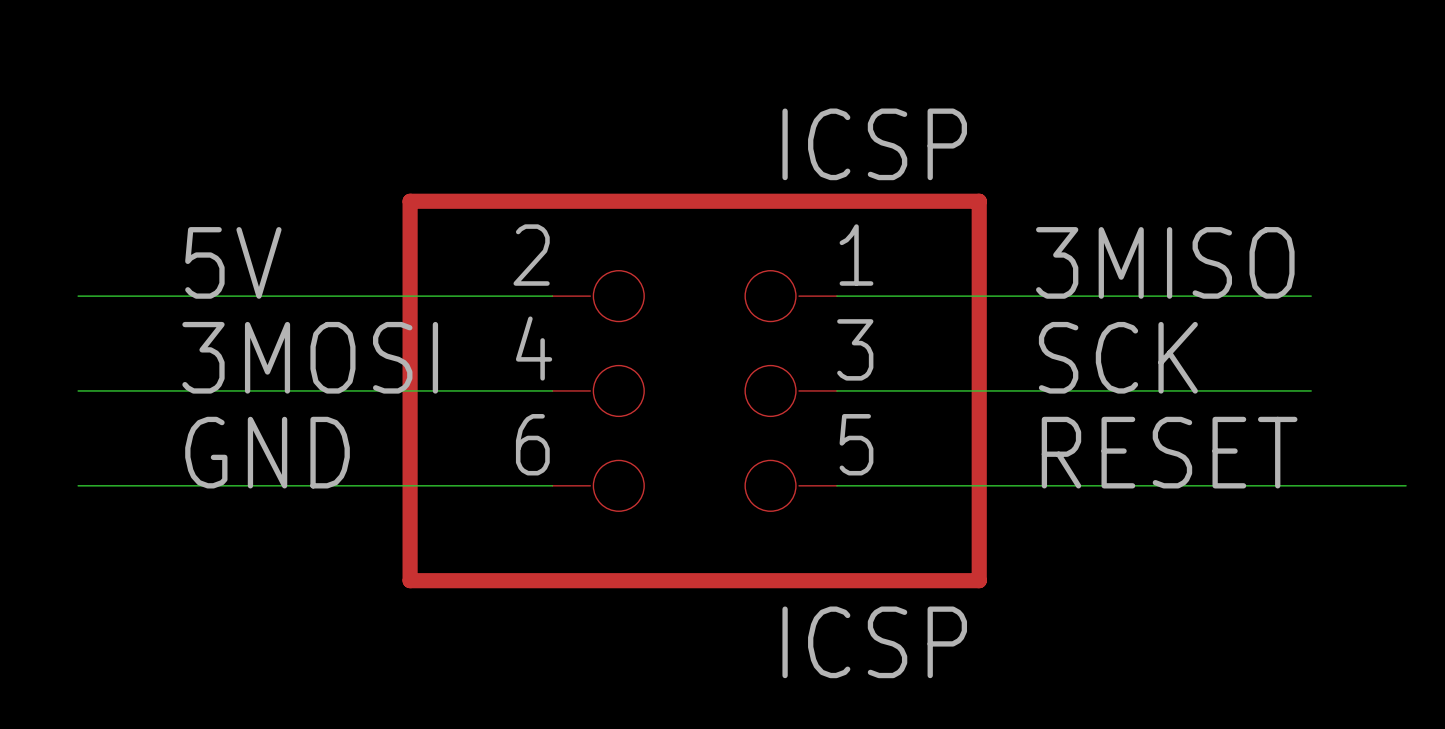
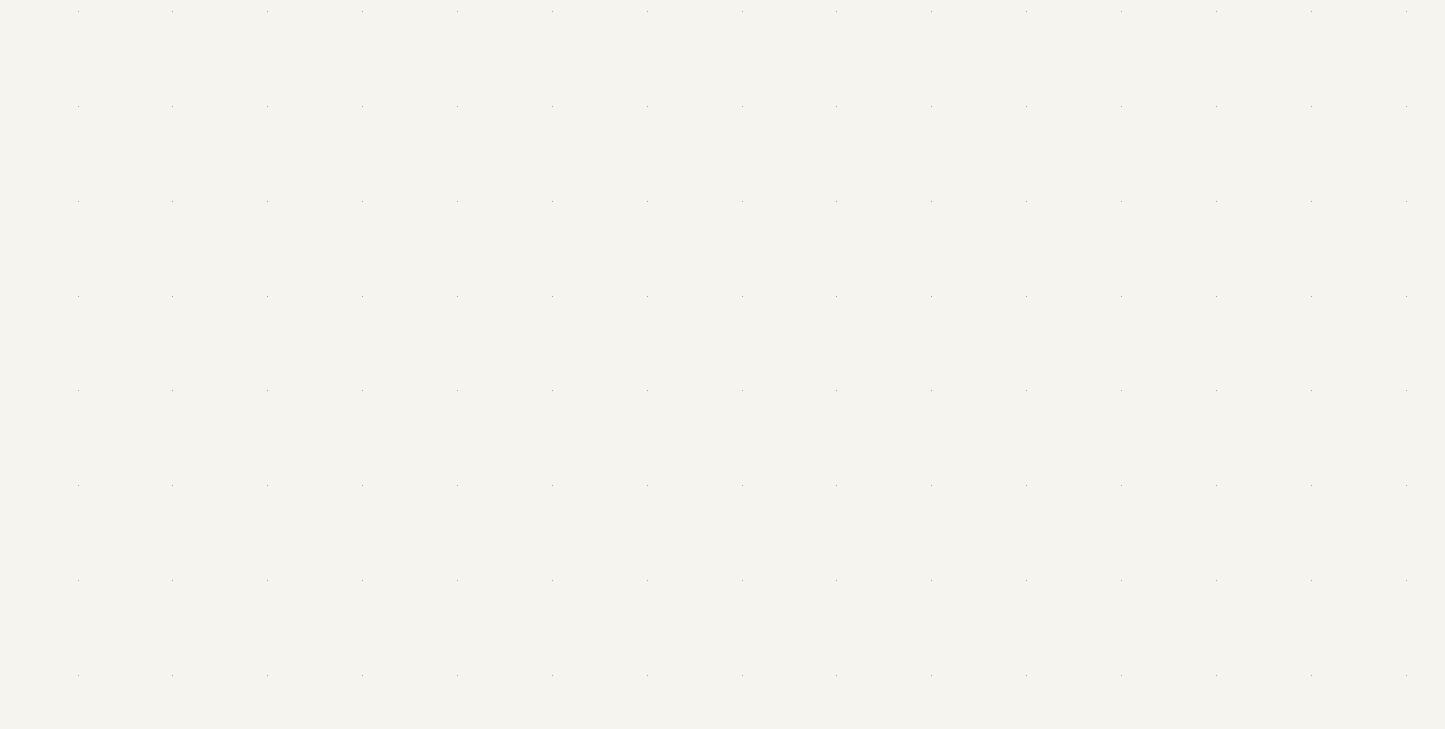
label: 5V (233, 262) -> none
label: 3MISO (1165, 262) -> none
wire: (78, 296) (552, 296) -> none
wire: (836, 296) (1311, 296) -> none
label: 3MOSI (310, 357) -> none
label: SCK (1118, 357) -> none
wire: (78, 390) (552, 390) -> none
ICSP: ICSP (694, 390) -> none
wire: (836, 390) (1311, 390) -> none
label: GND (267, 452) -> none
label: RESET (1169, 452) -> none
wire: (78, 485) (552, 485) -> none
wire: (836, 485) (1406, 485) -> none

